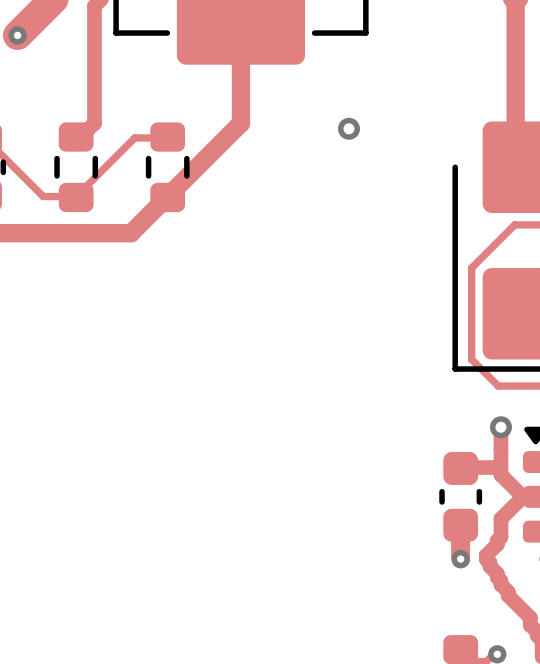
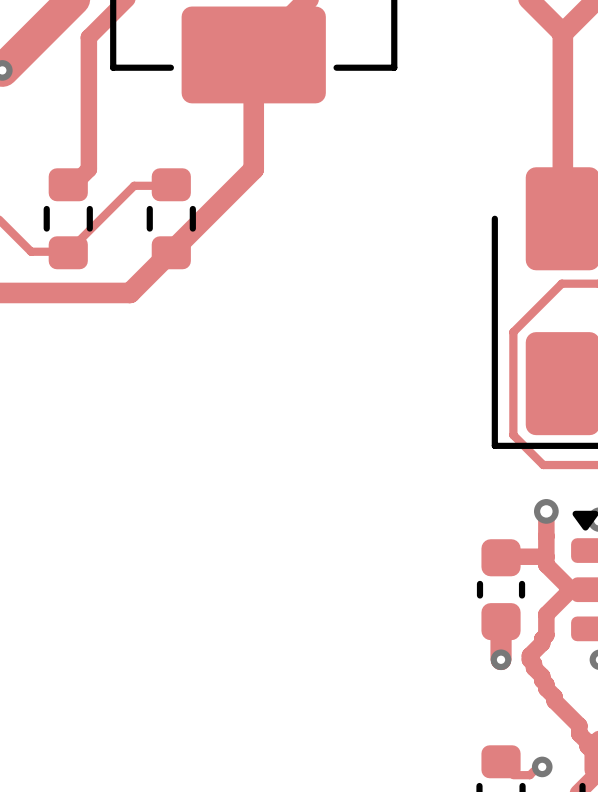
via: (348, 128) -> none

